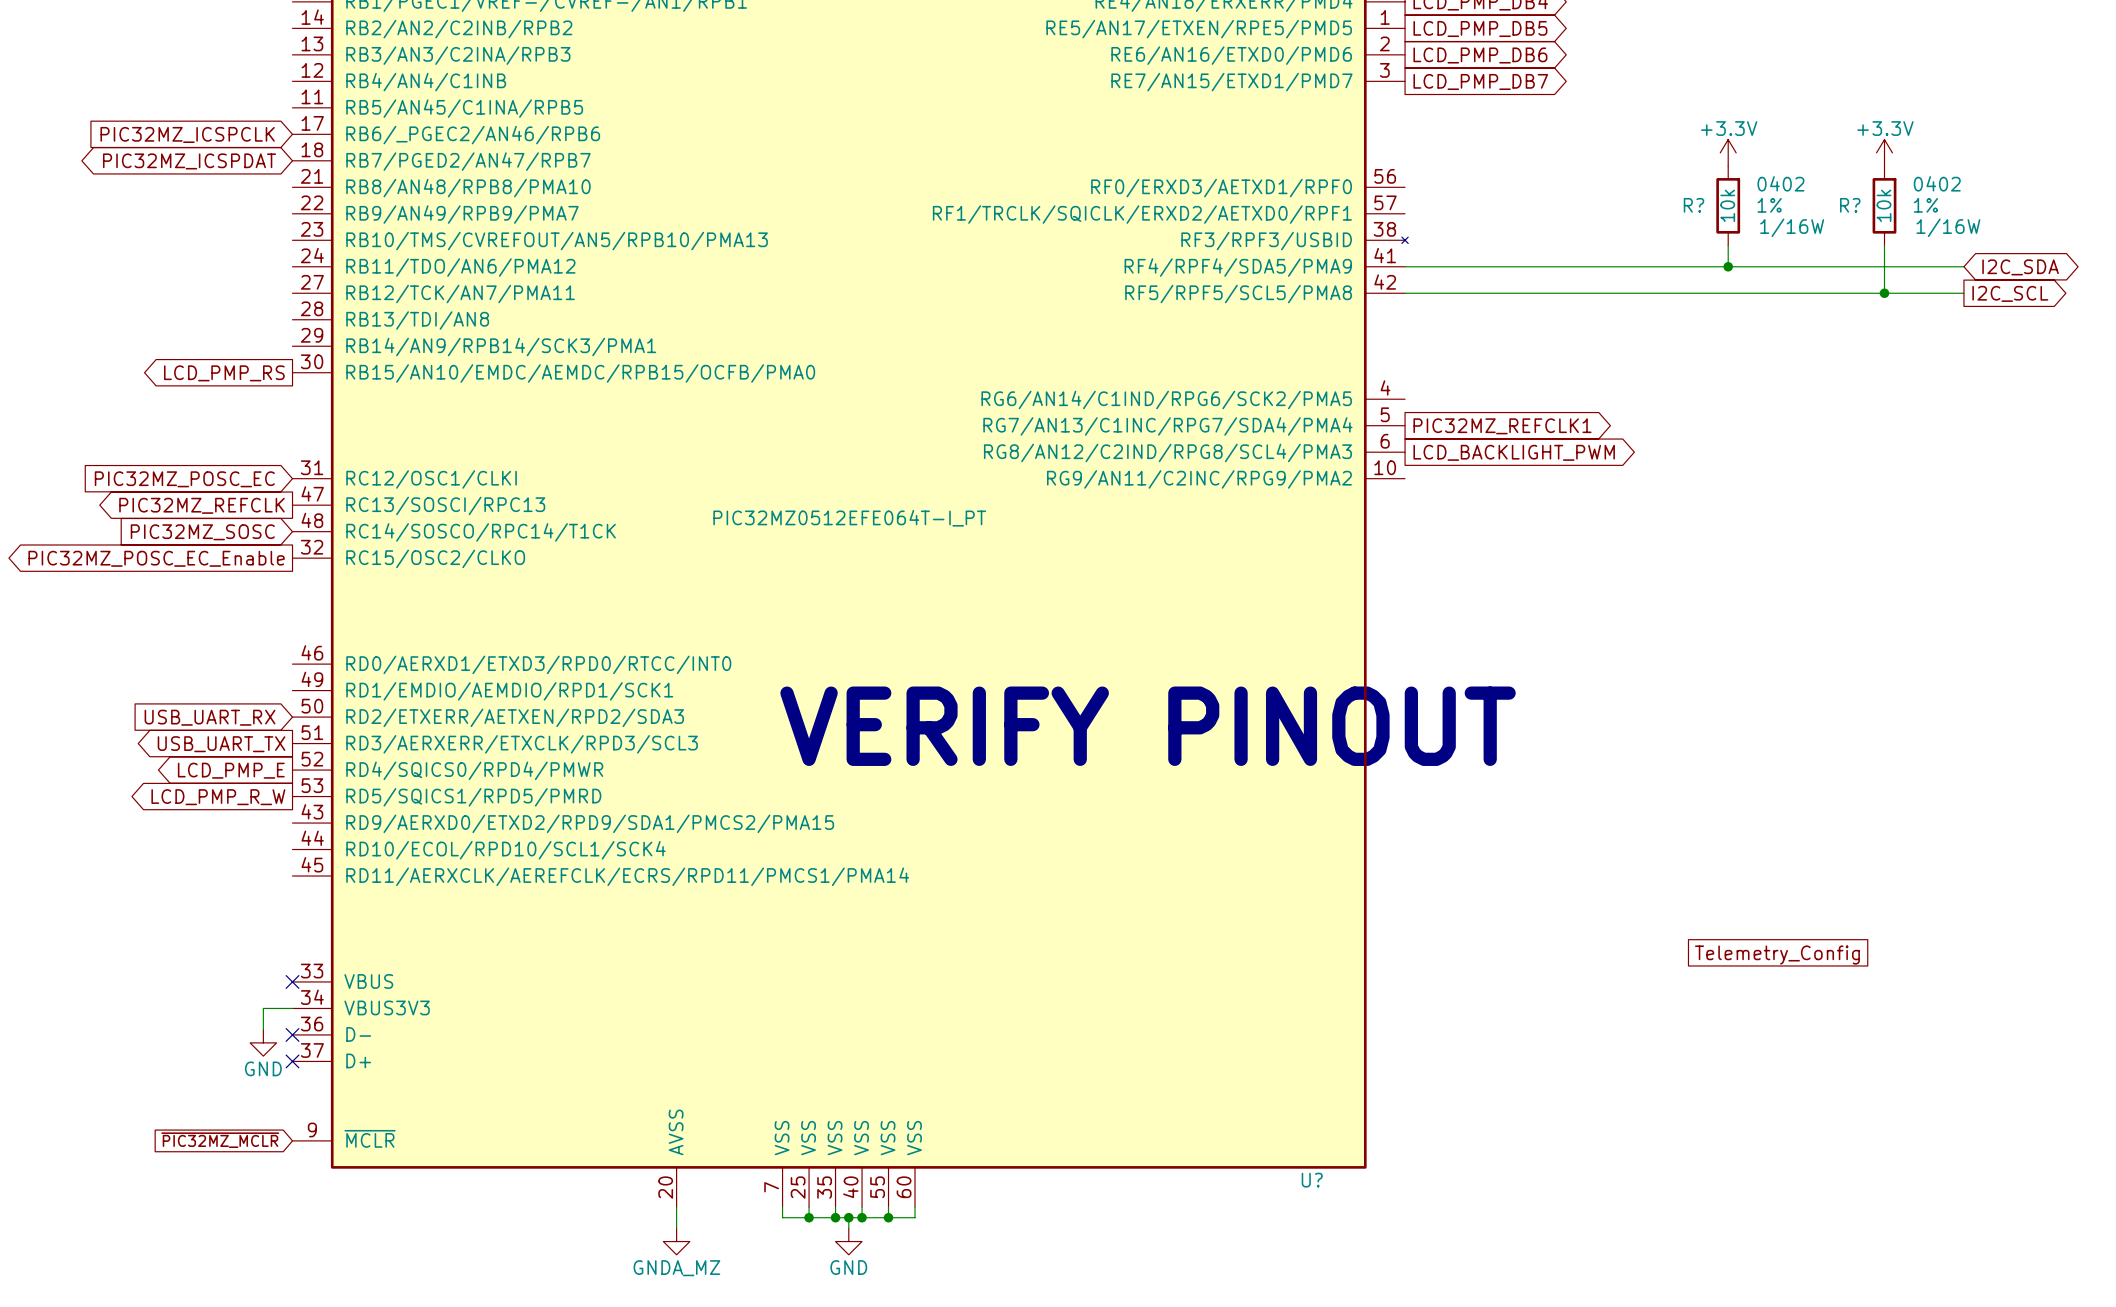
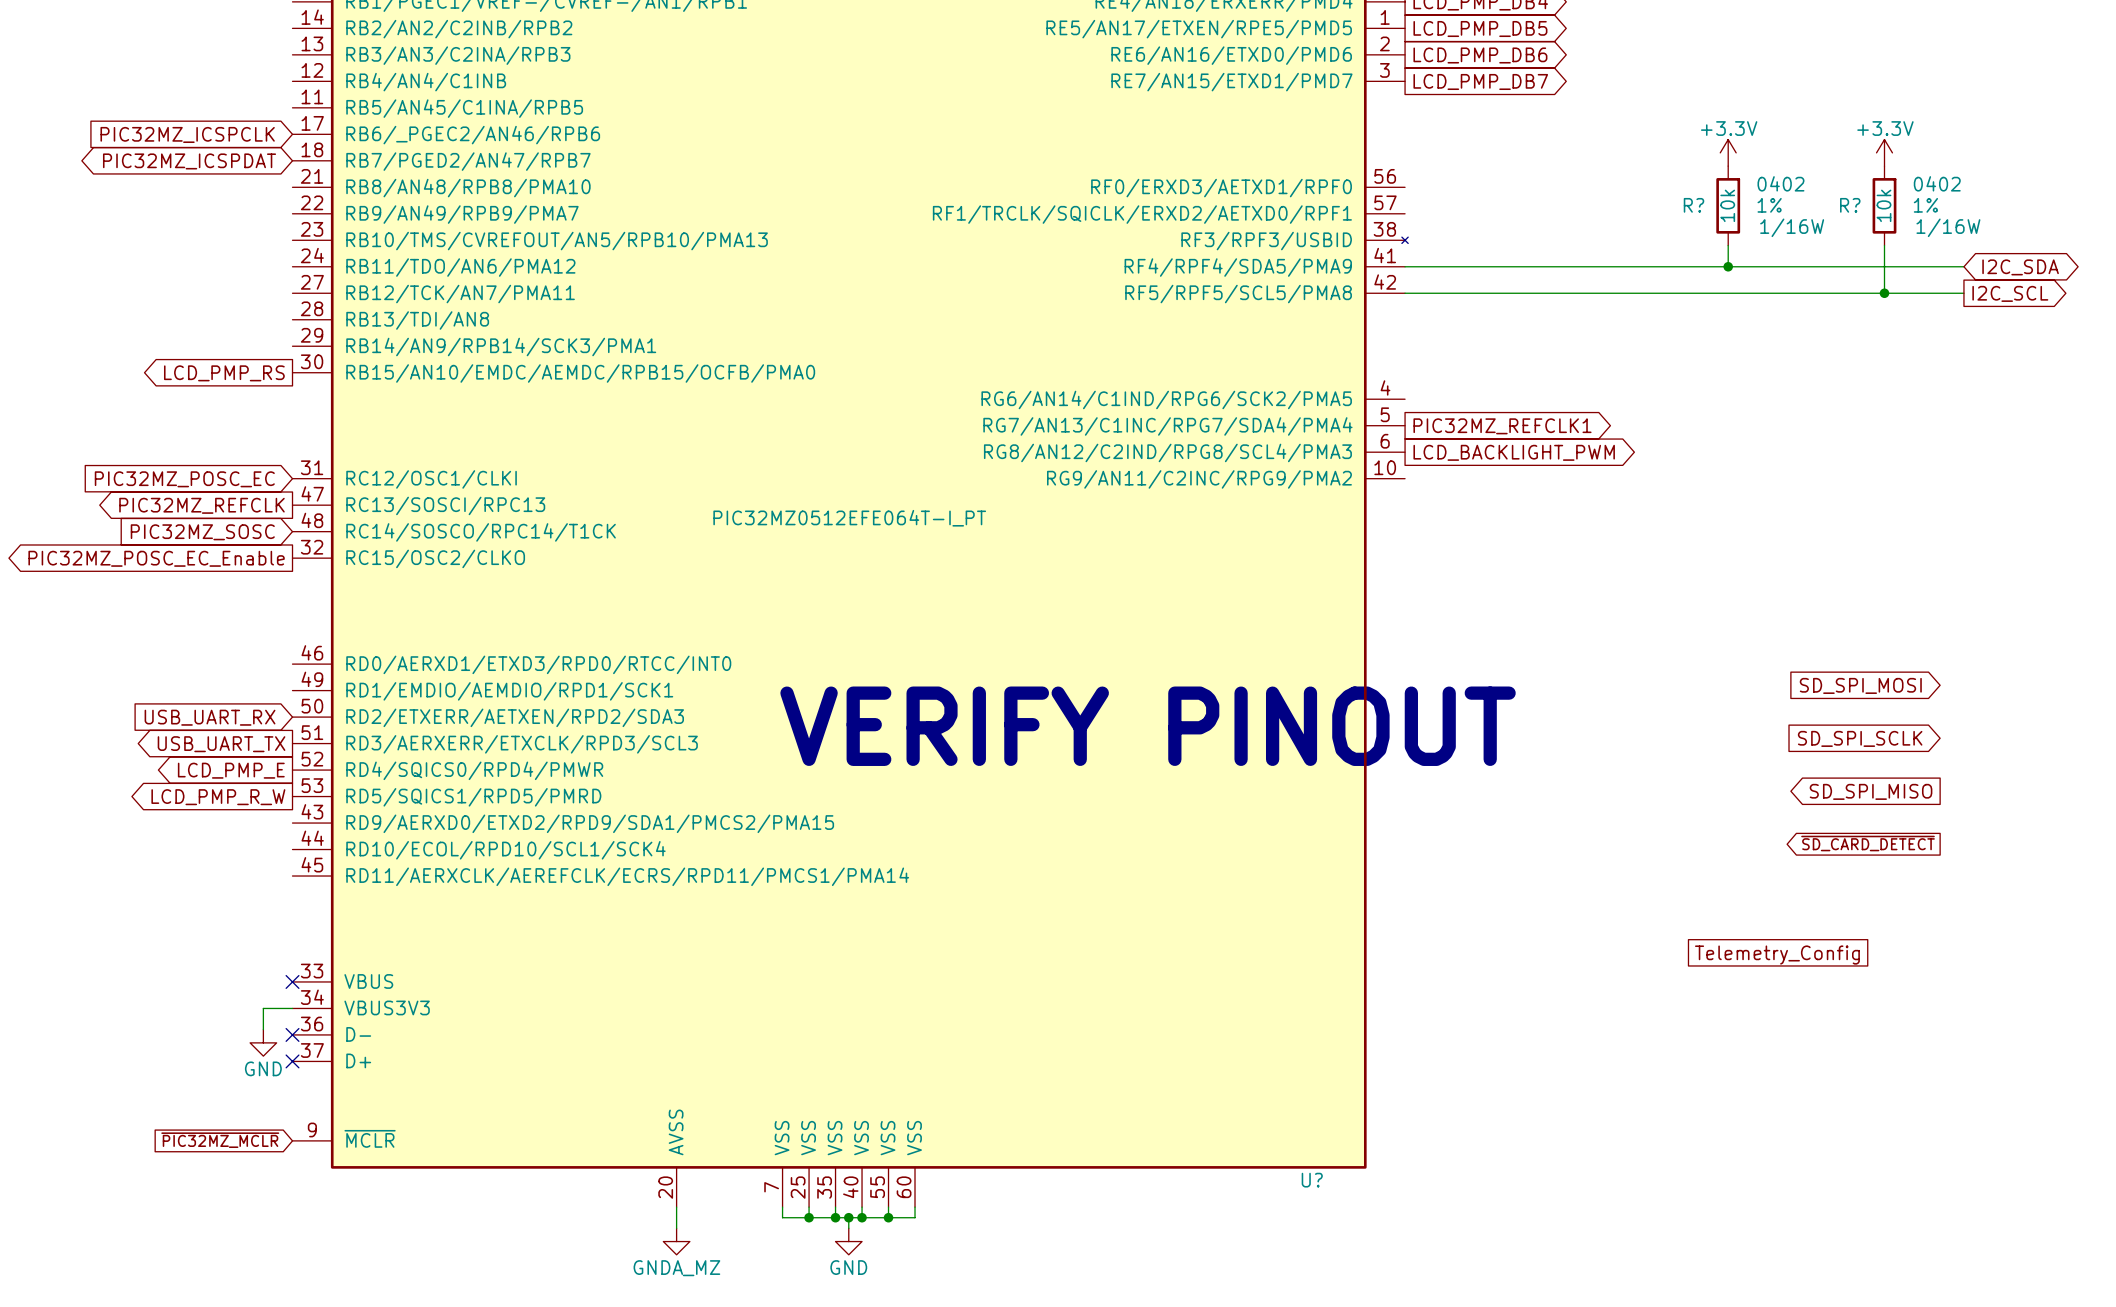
global label: none -> SD_SPI_MOSI (1860, 685)
global label: none -> SD_SPI_SCLK (1860, 738)
global label: none -> SD_SPI_MISO (1871, 791)
global label: none -> ~{SD_CARD_DETECT} (1868, 843)

